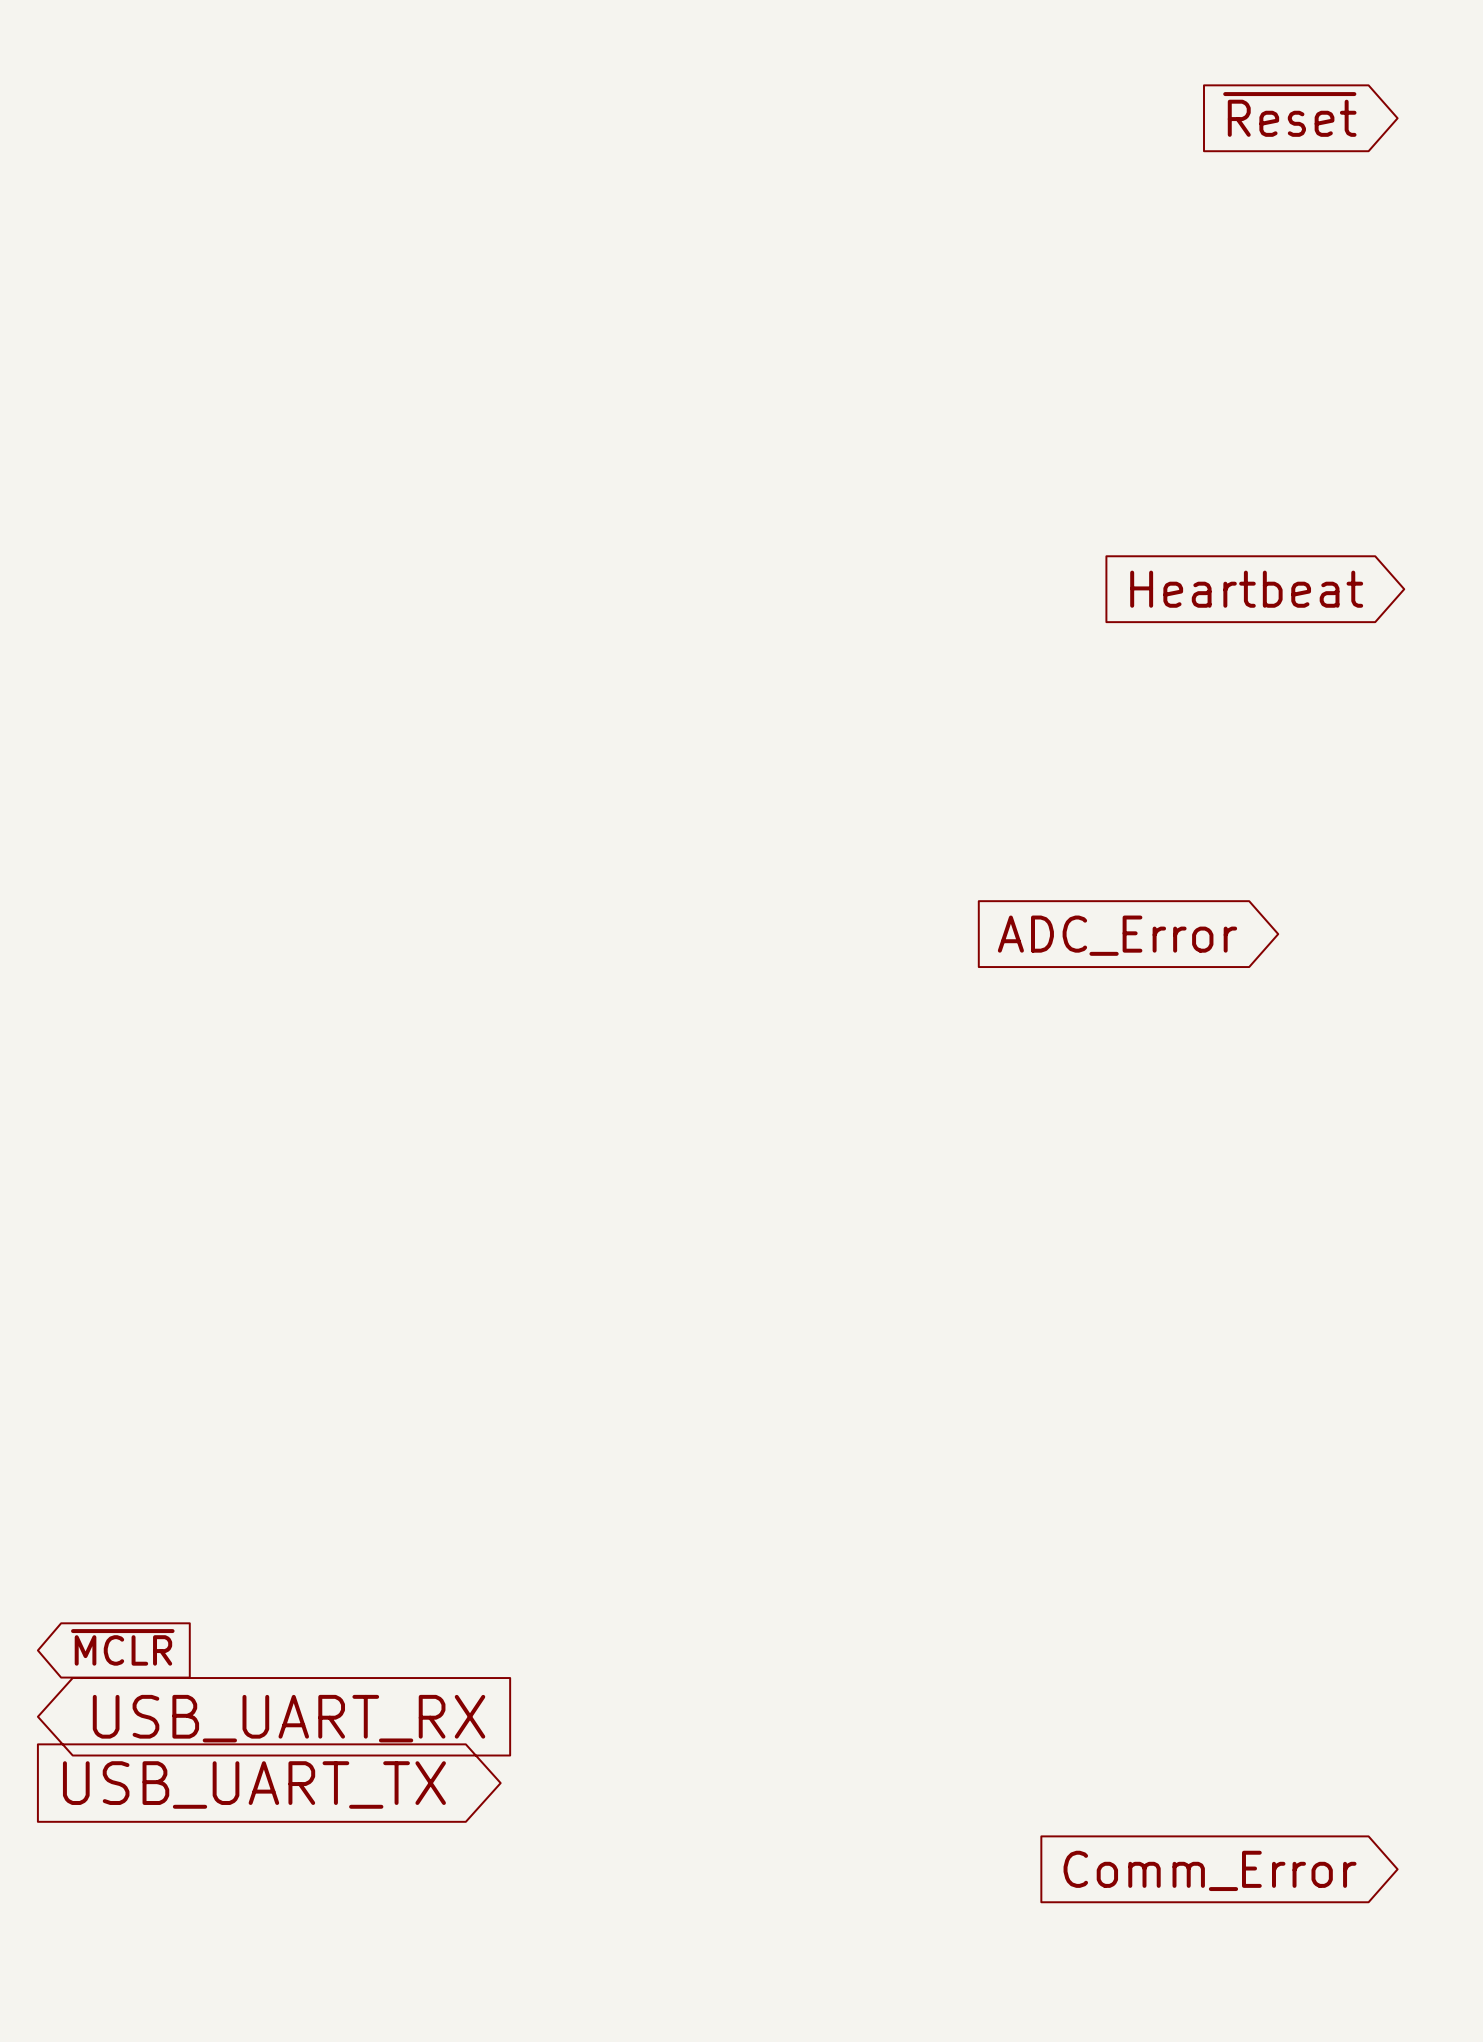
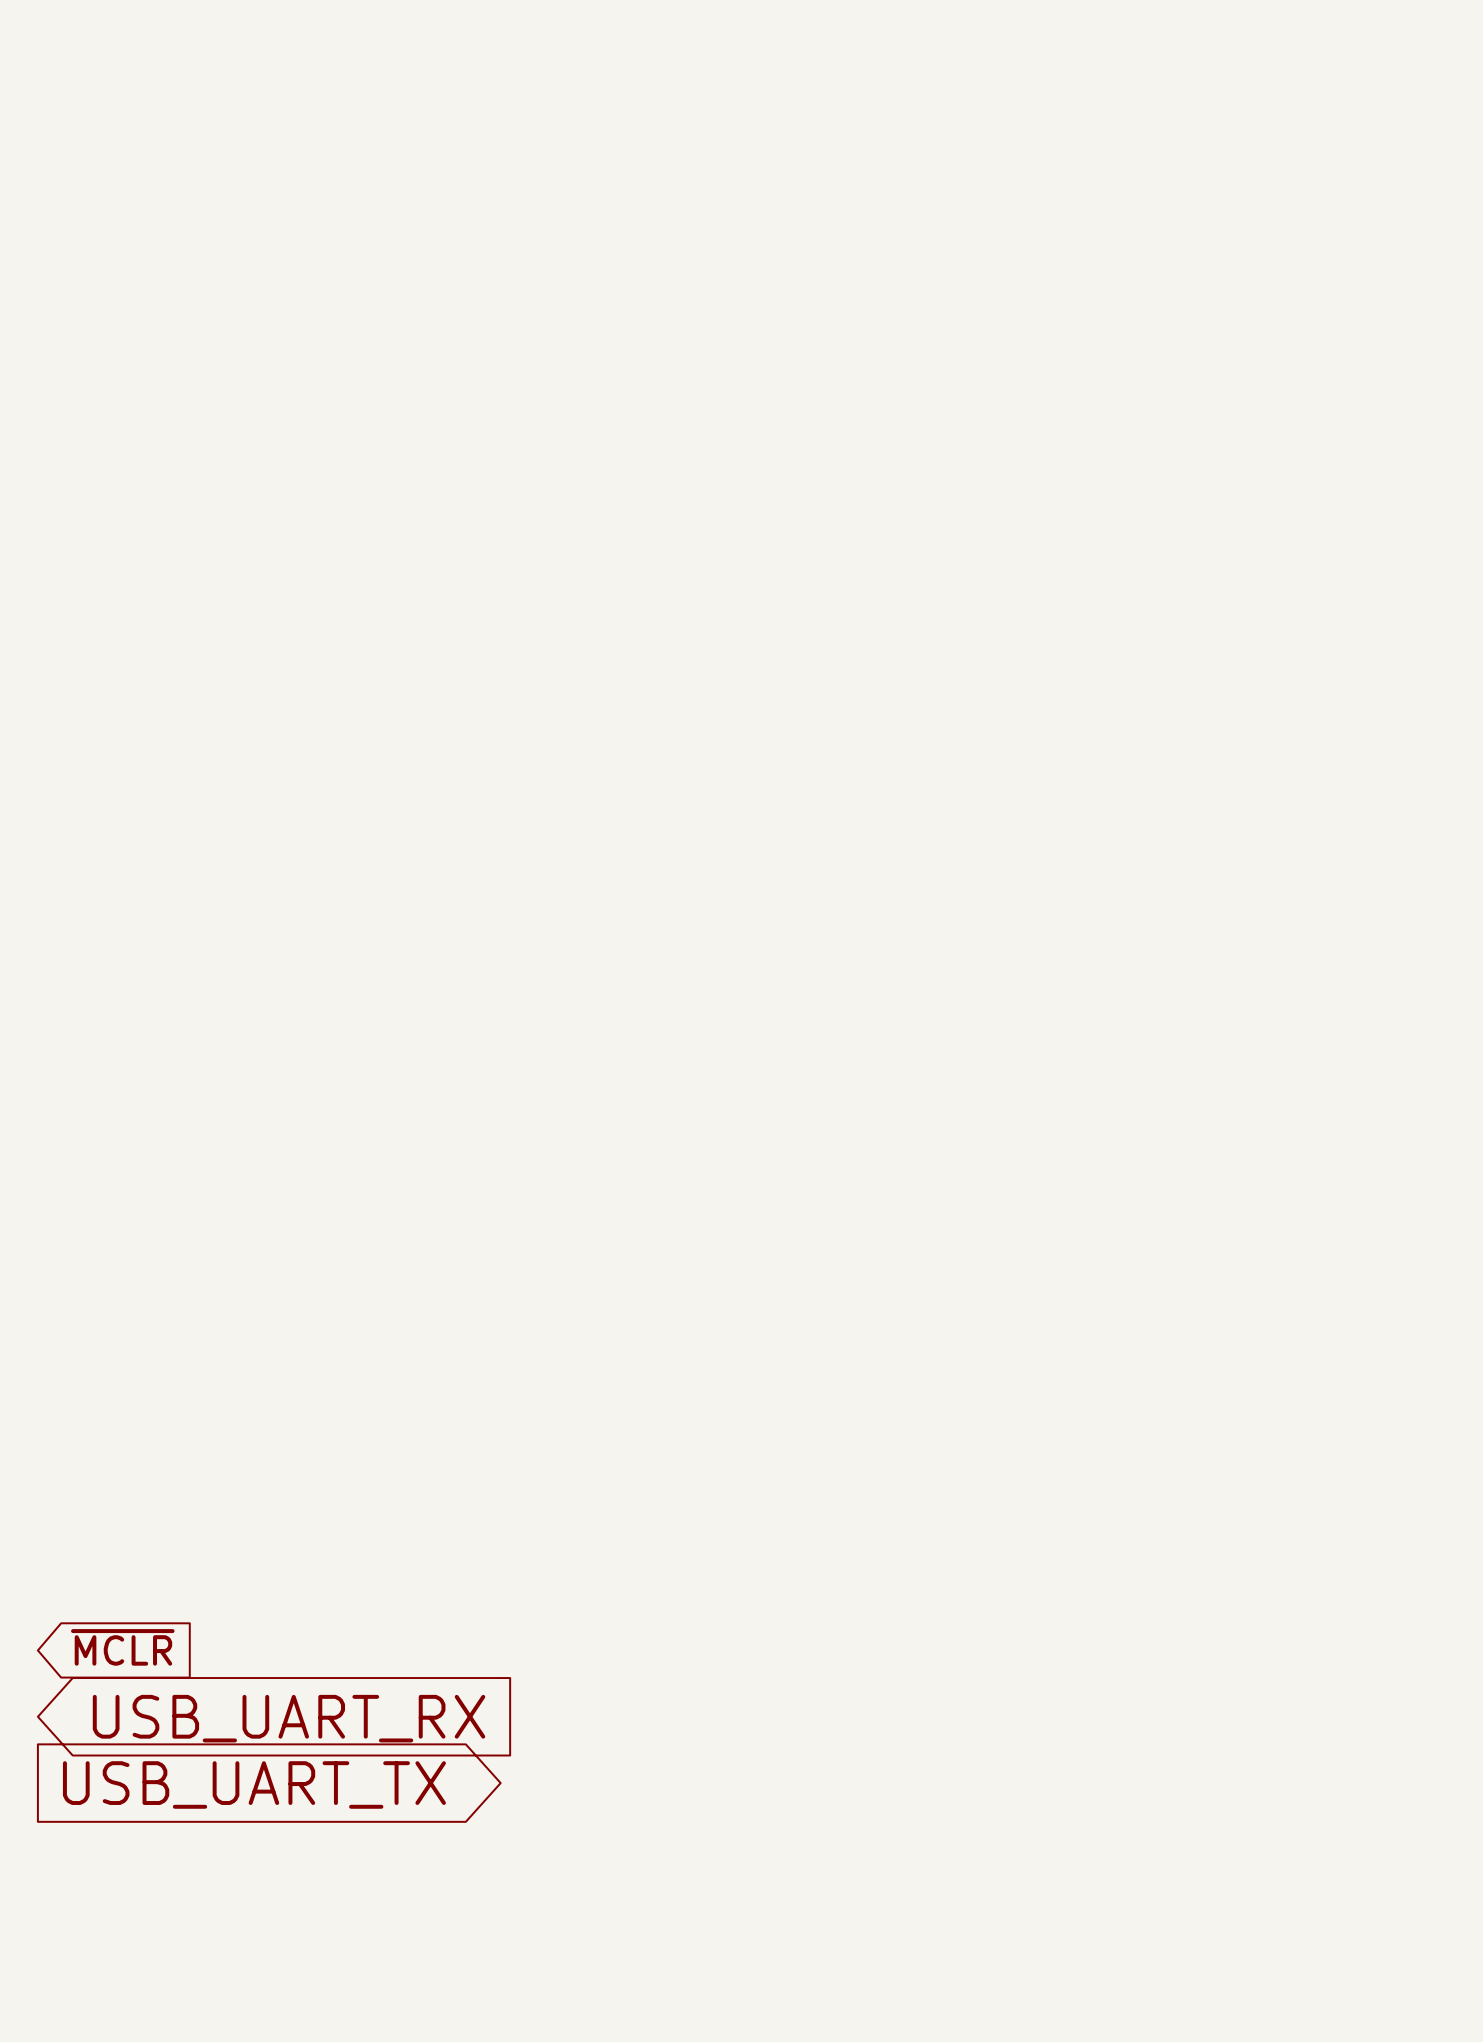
global label: ~{Reset} (1289, 114) -> none
global label: Heartbeat (1246, 589) -> none
global label: ADC_Error (1117, 935) -> none
global label: Comm_Error (1210, 1870) -> none

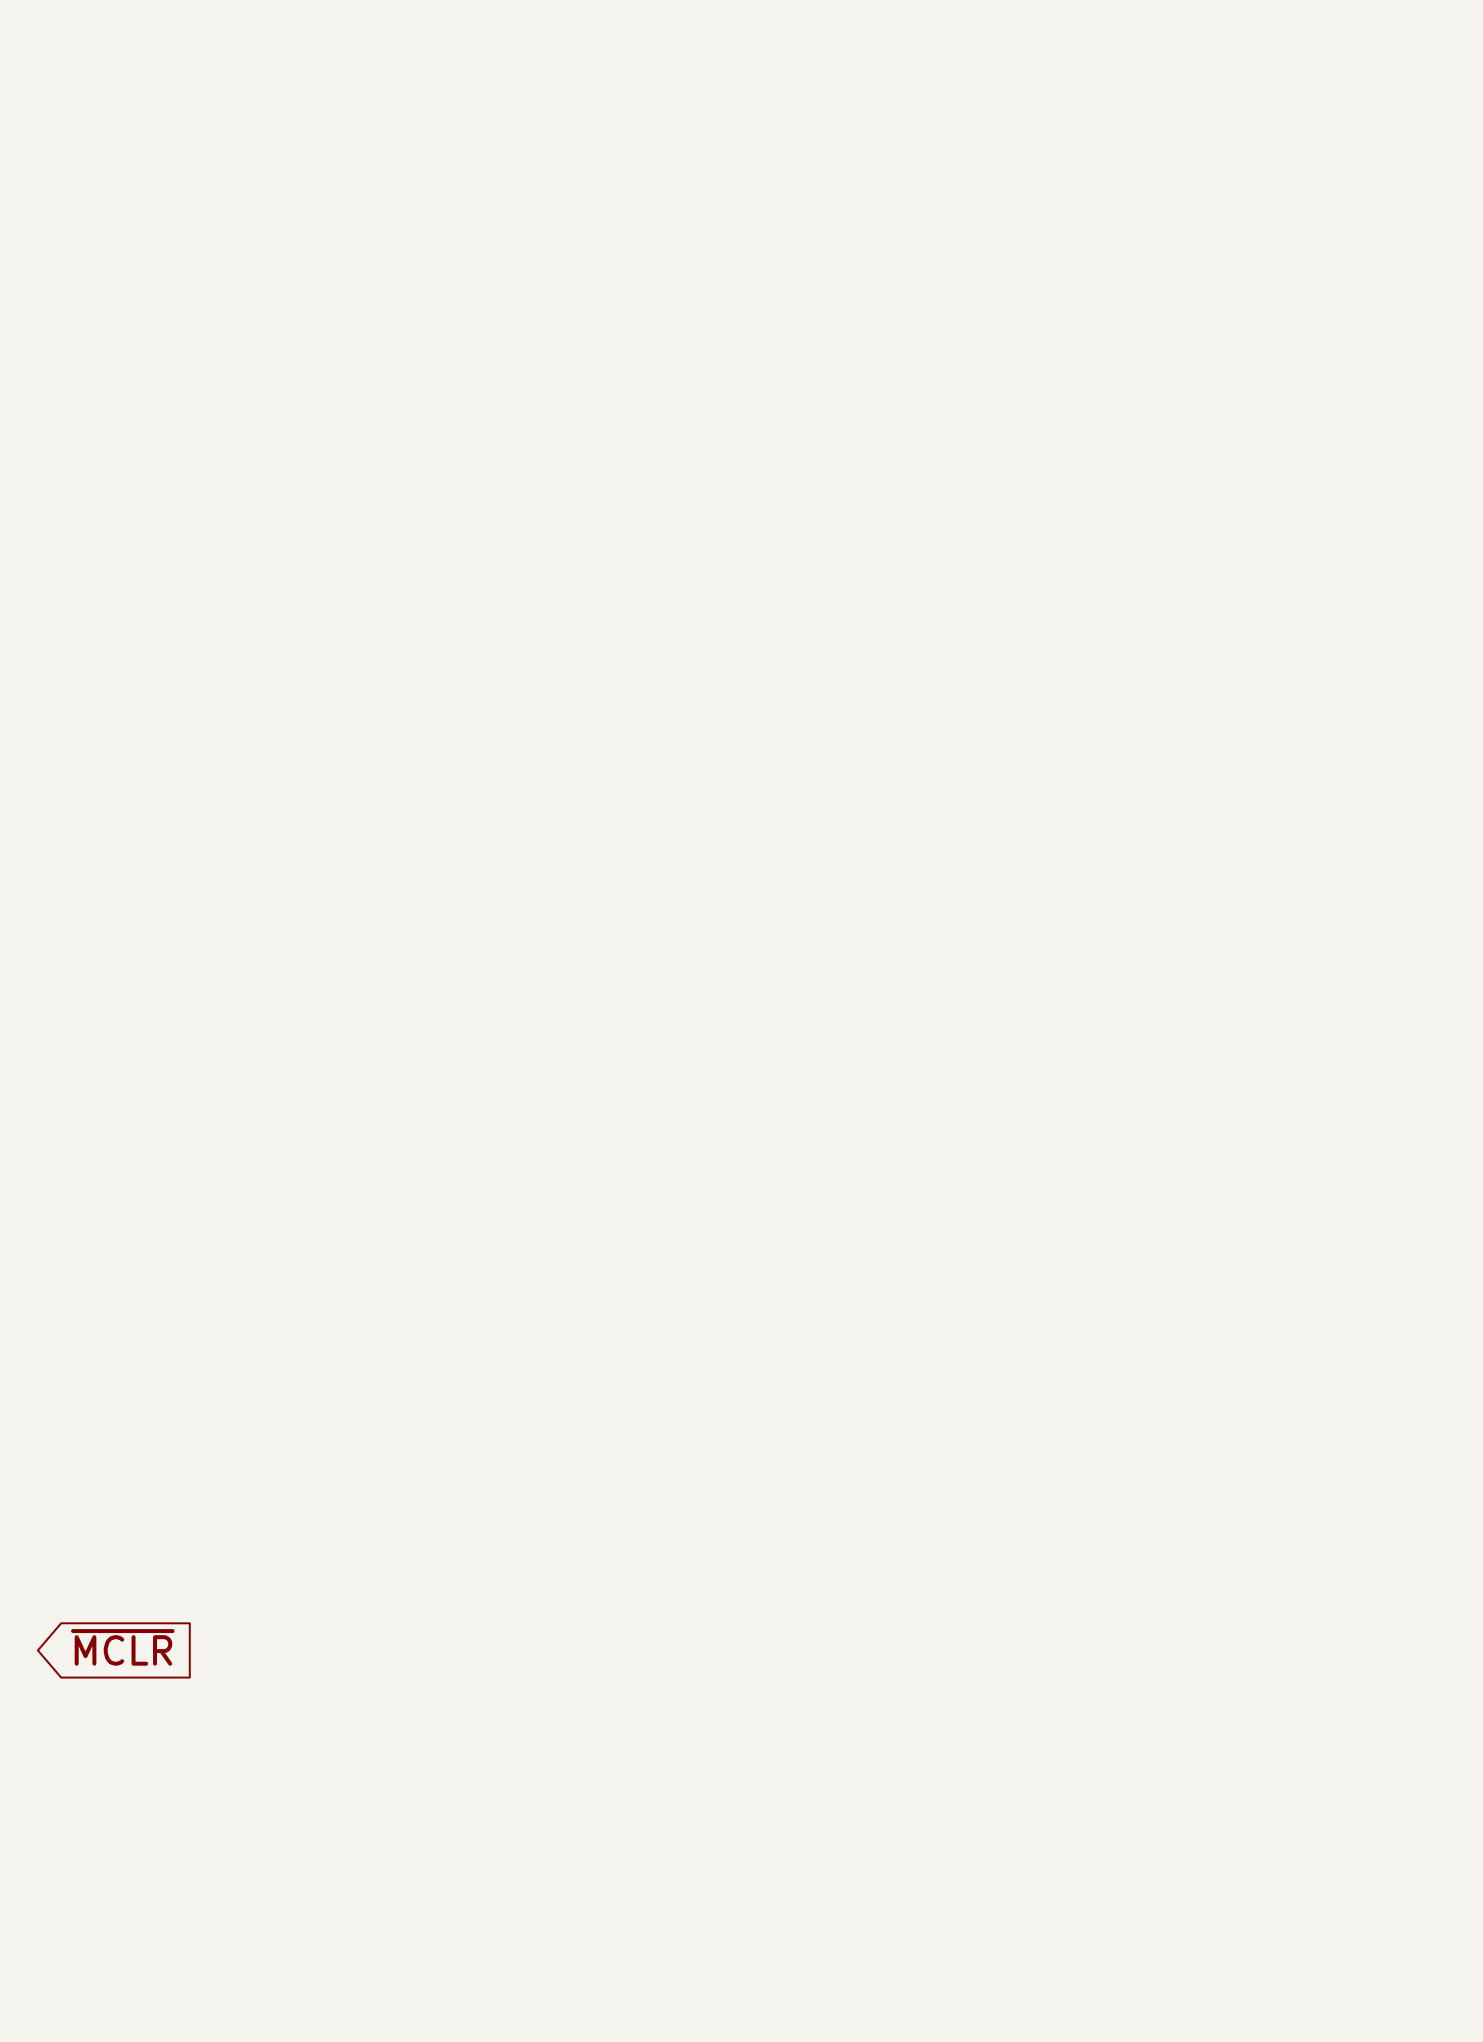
global label: USB_UART_RX (289, 1718) -> none
global label: USB_UART_TX (254, 1784) -> none

